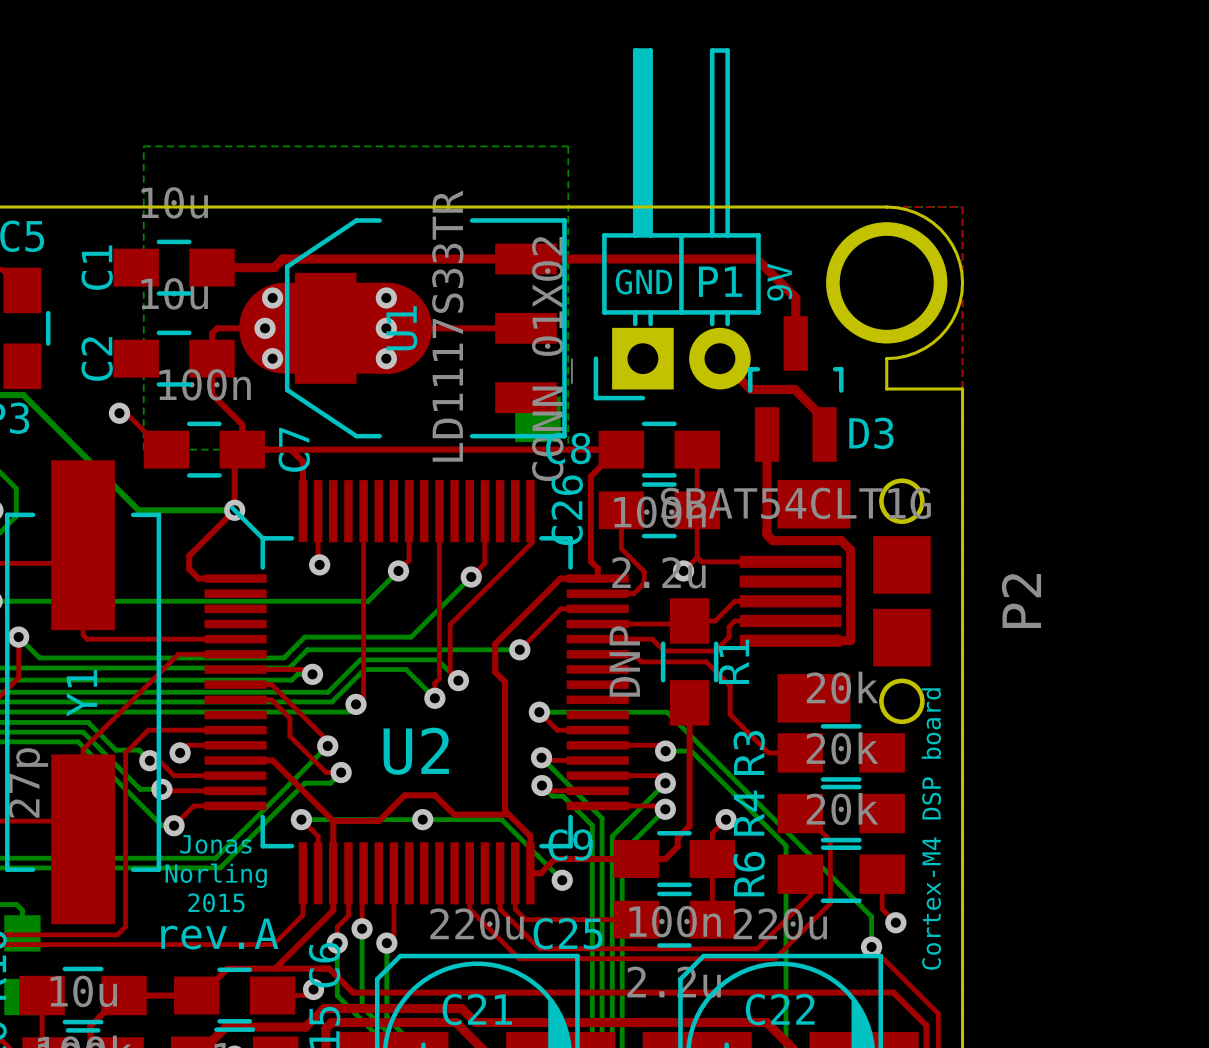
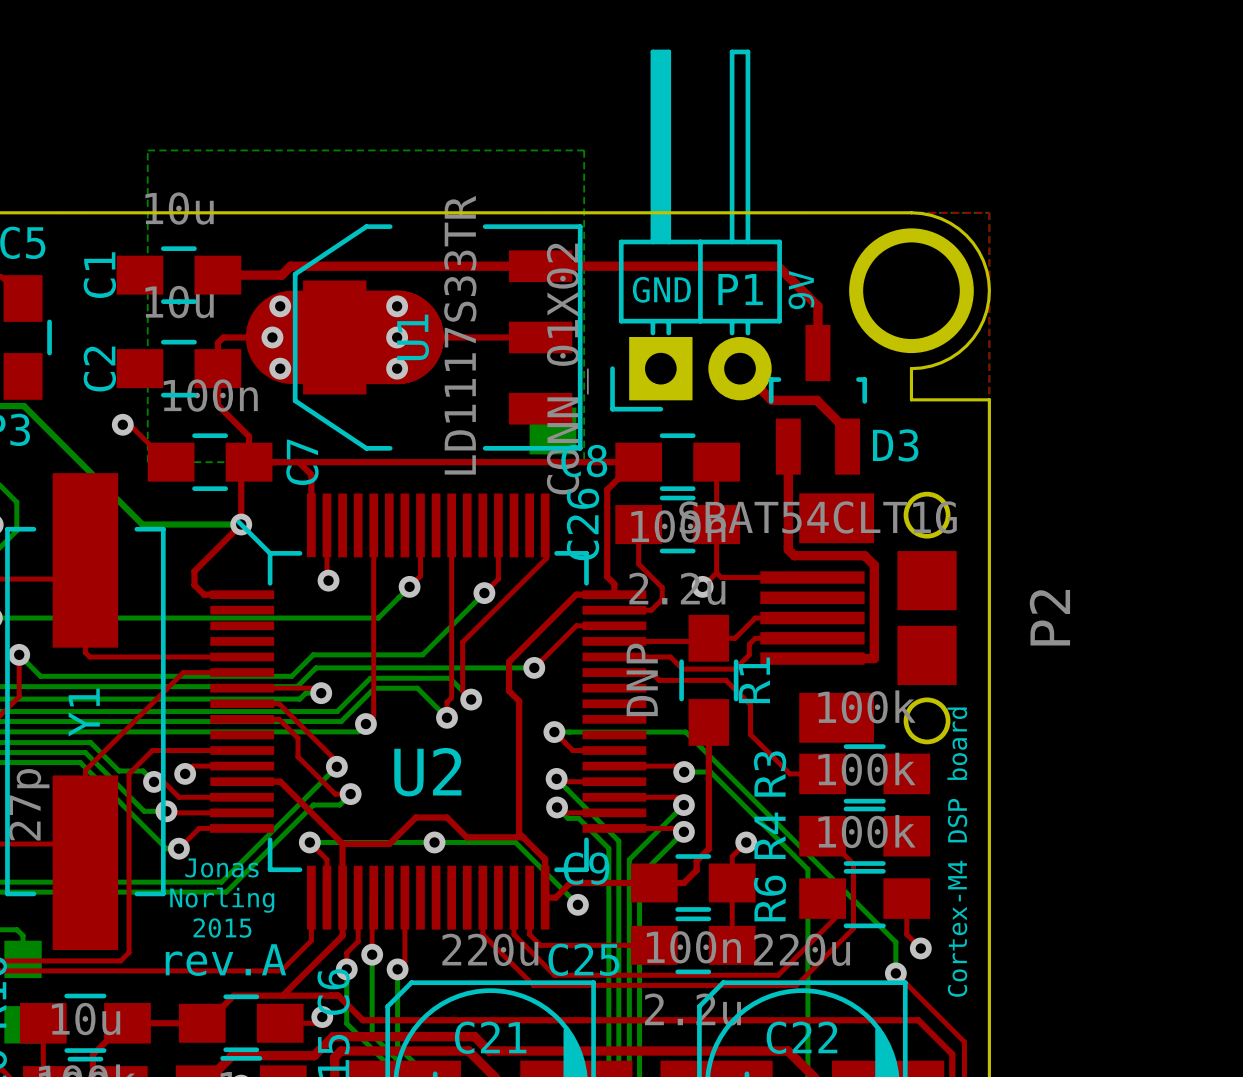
R3 value: 20k (842, 687) -> 100k (866, 706)
R4 value: 20k (842, 748) -> 100k (866, 769)
R6 value: 20k (842, 809) -> 100k (866, 831)

